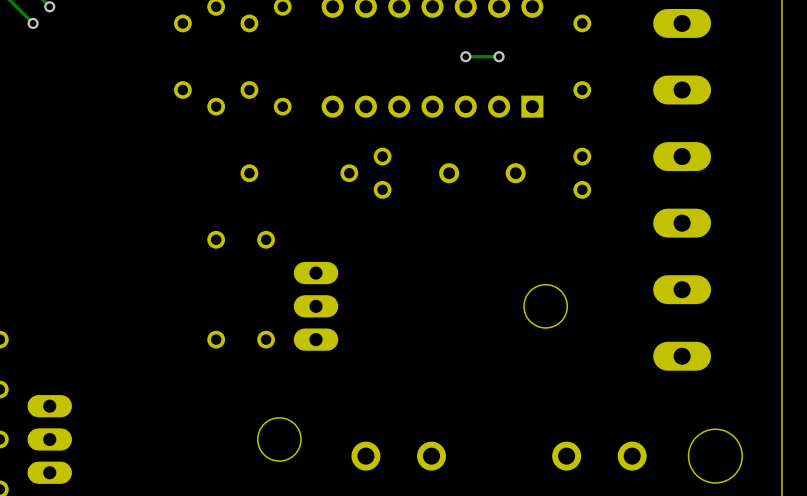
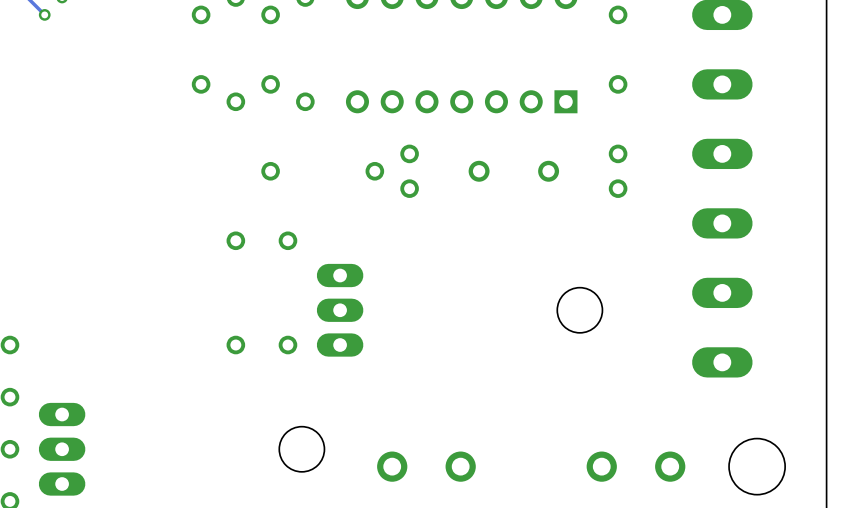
via: (465, 56) -> none
track: (499, 56) (465, 56) -> none
via: (499, 56) -> none

